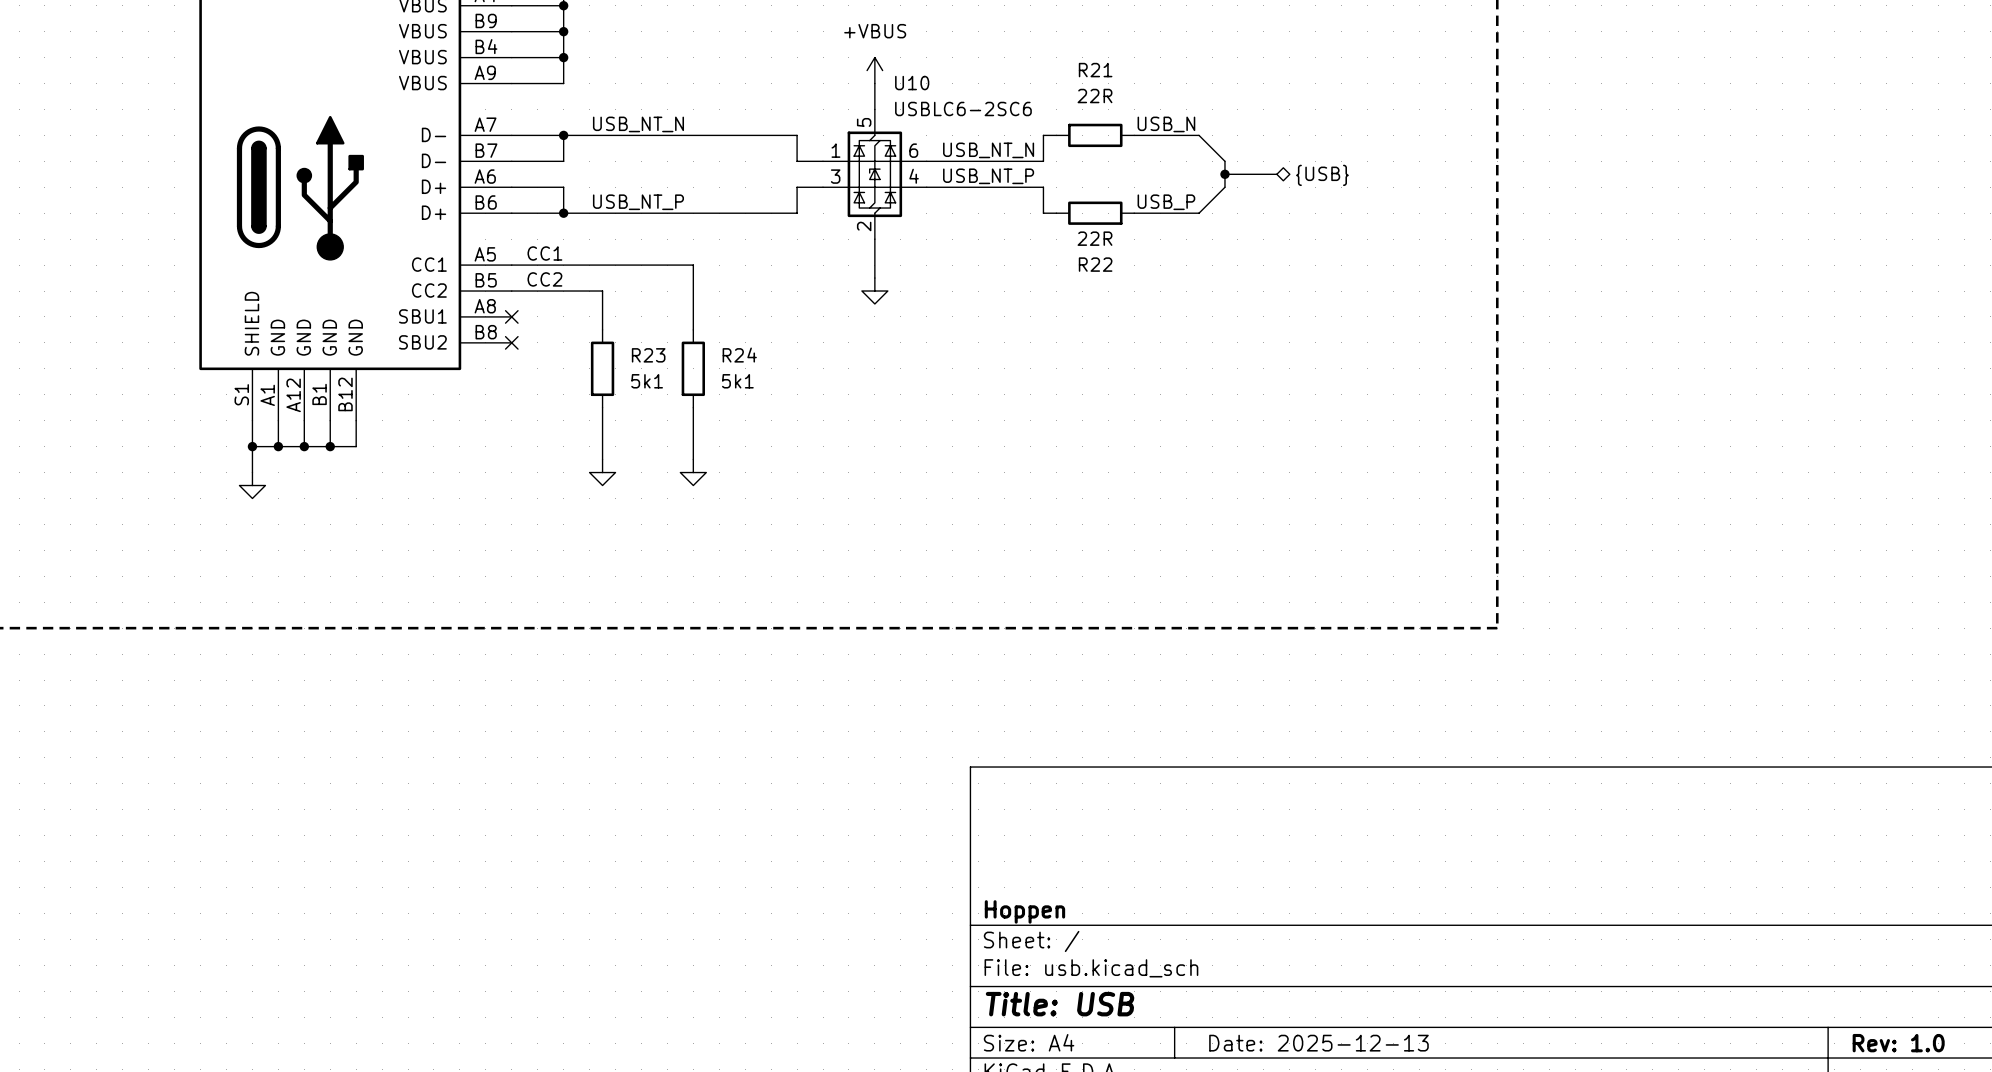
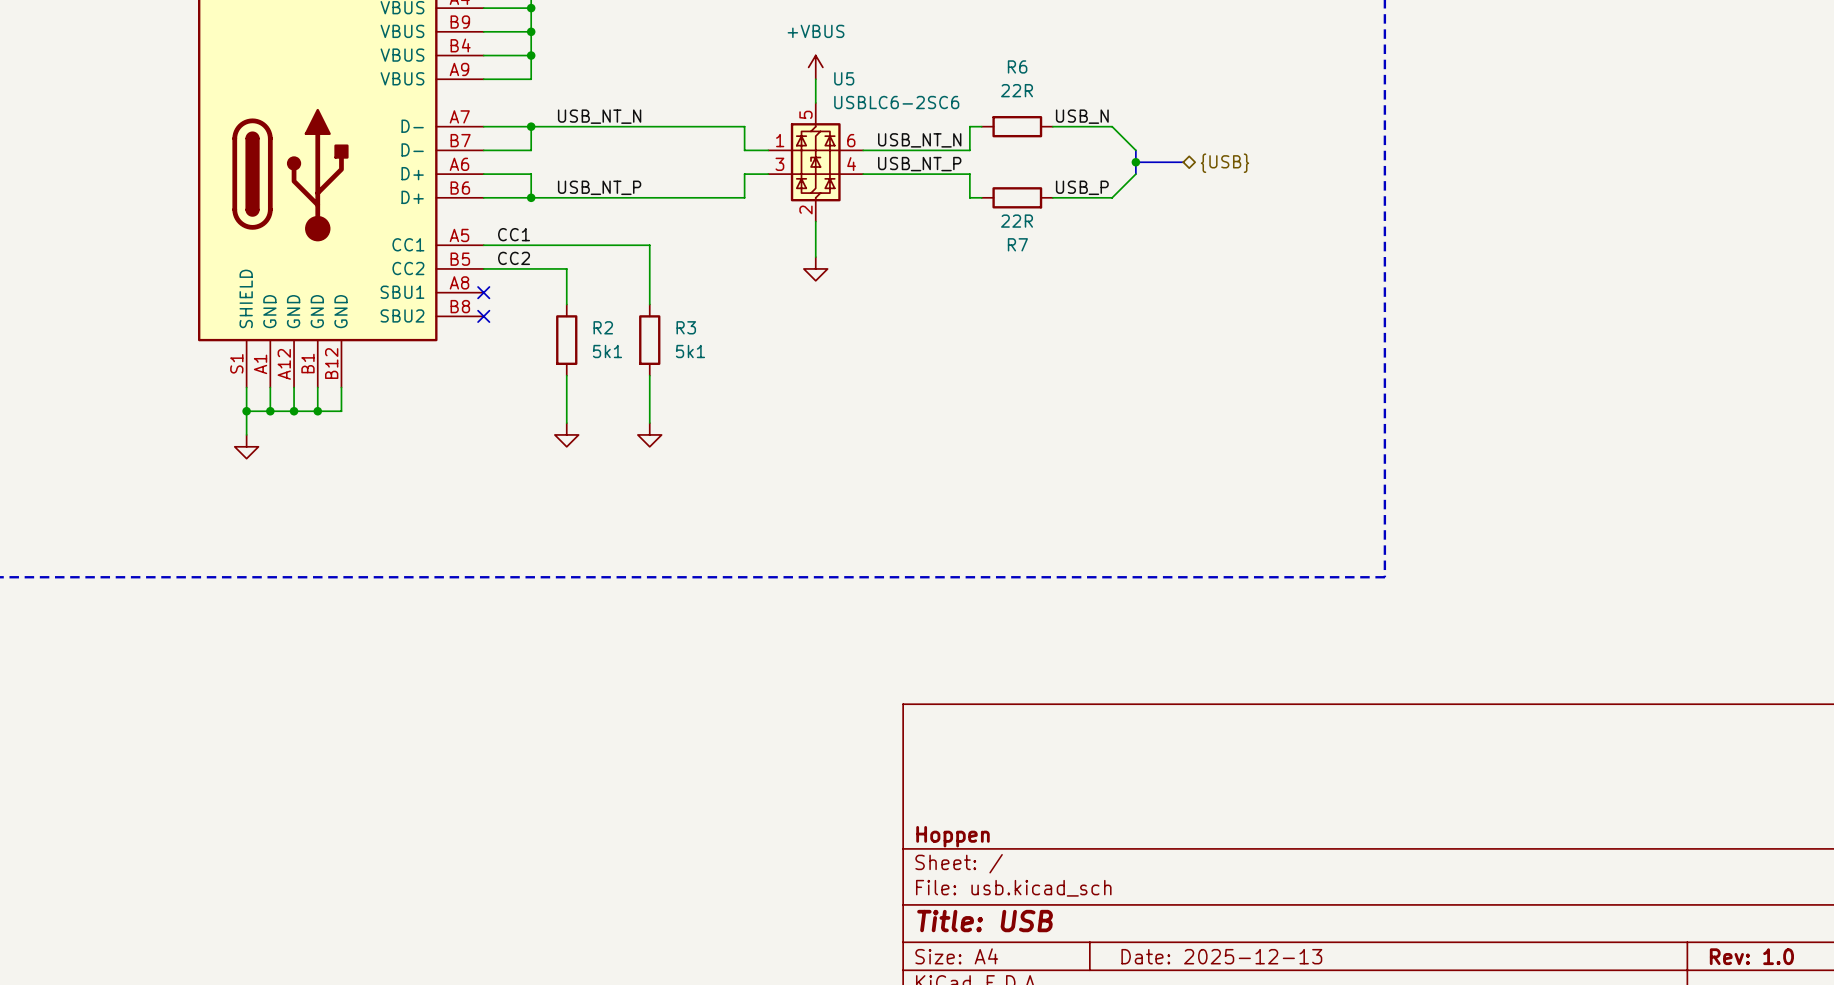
R21 name: R21 (1095, 70) -> R6 (1017, 66)
U10 name: U10 (912, 83) -> U5 (844, 78)
R22 name: R22 (1095, 264) -> R7 (1017, 244)
R23 name: R23 (648, 355) -> R2 (603, 327)
R24 name: R24 (739, 355) -> R3 (686, 327)

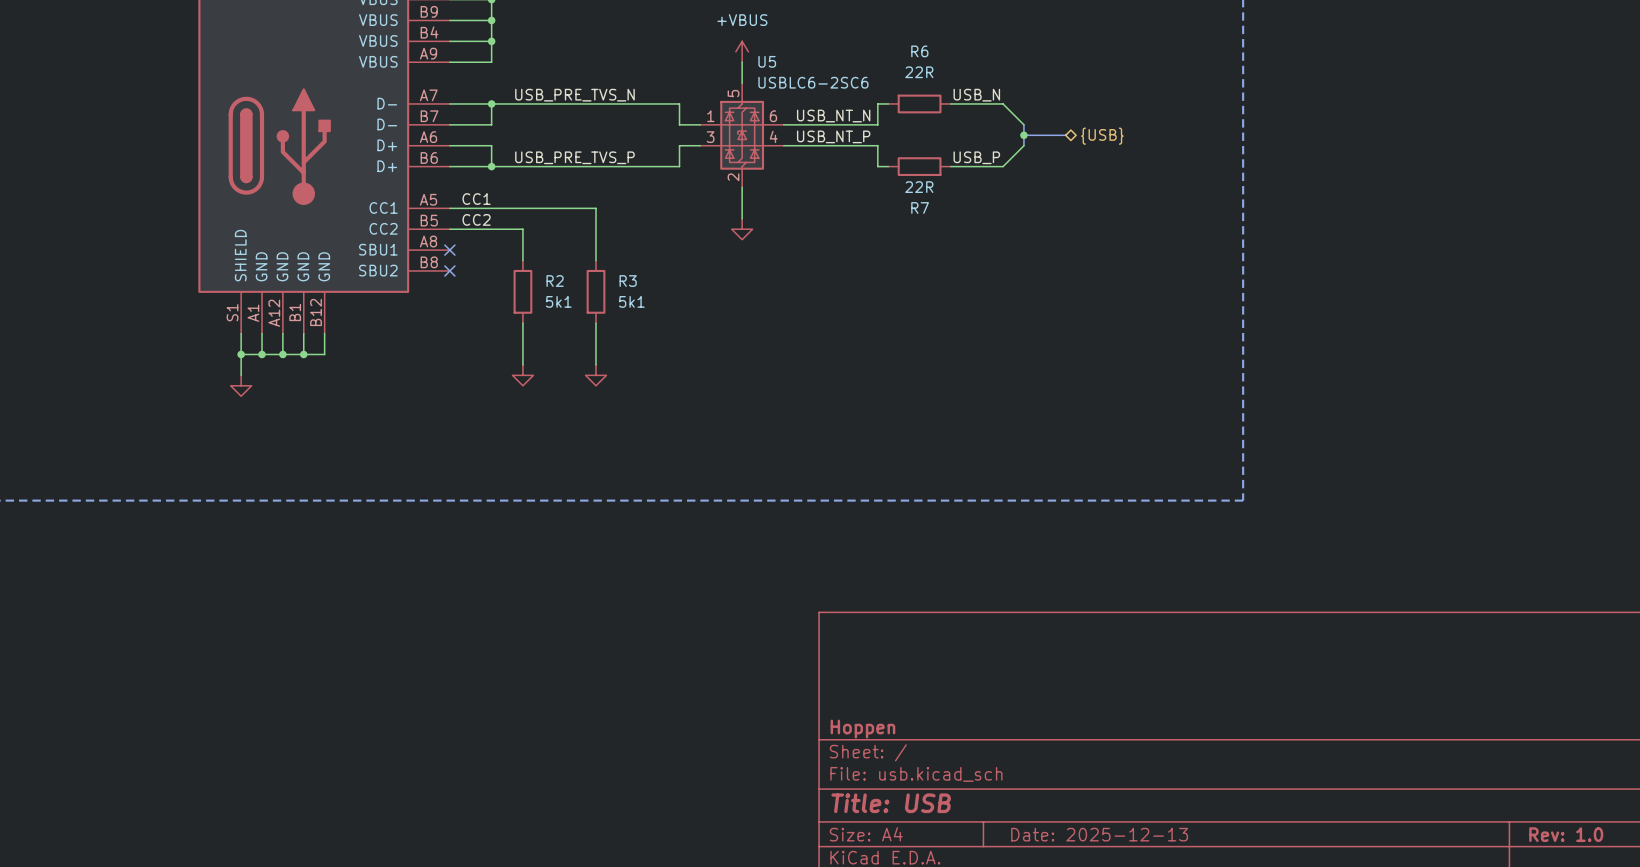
label: USB_NT_N (599, 116) -> USB_PRE_TVS_N (574, 95)
label: USB_NT_P (599, 187) -> USB_PRE_TVS_P (574, 157)

